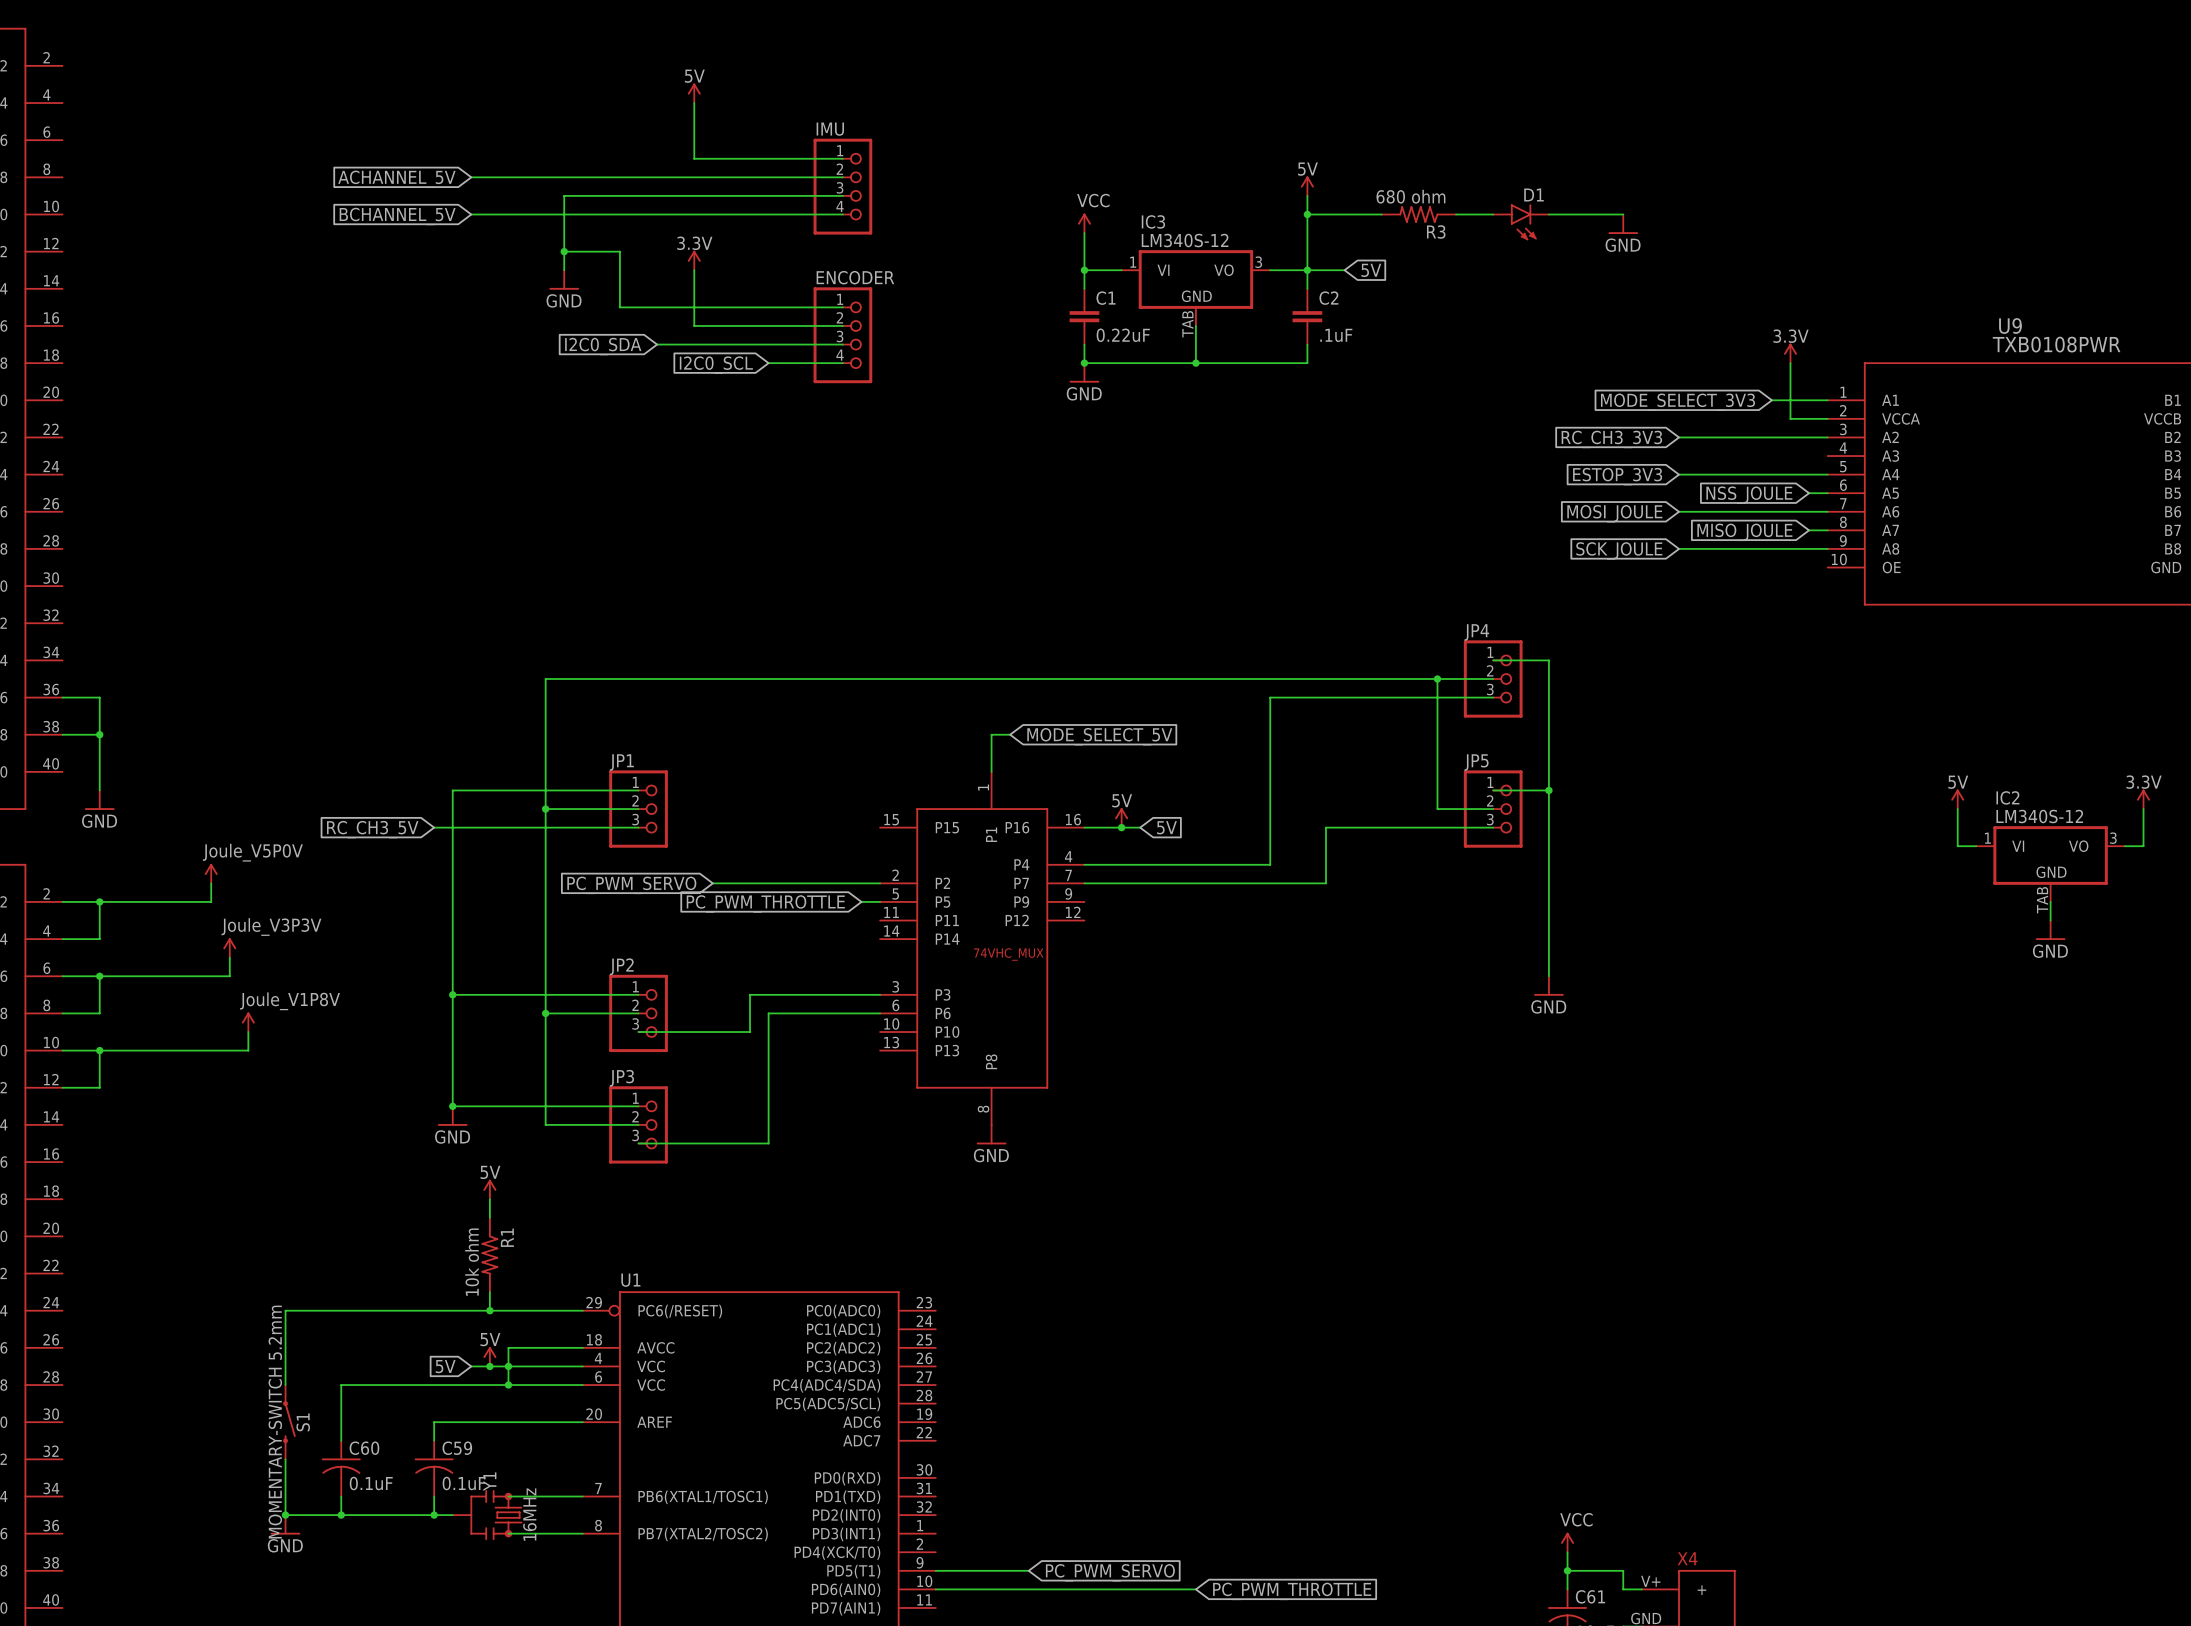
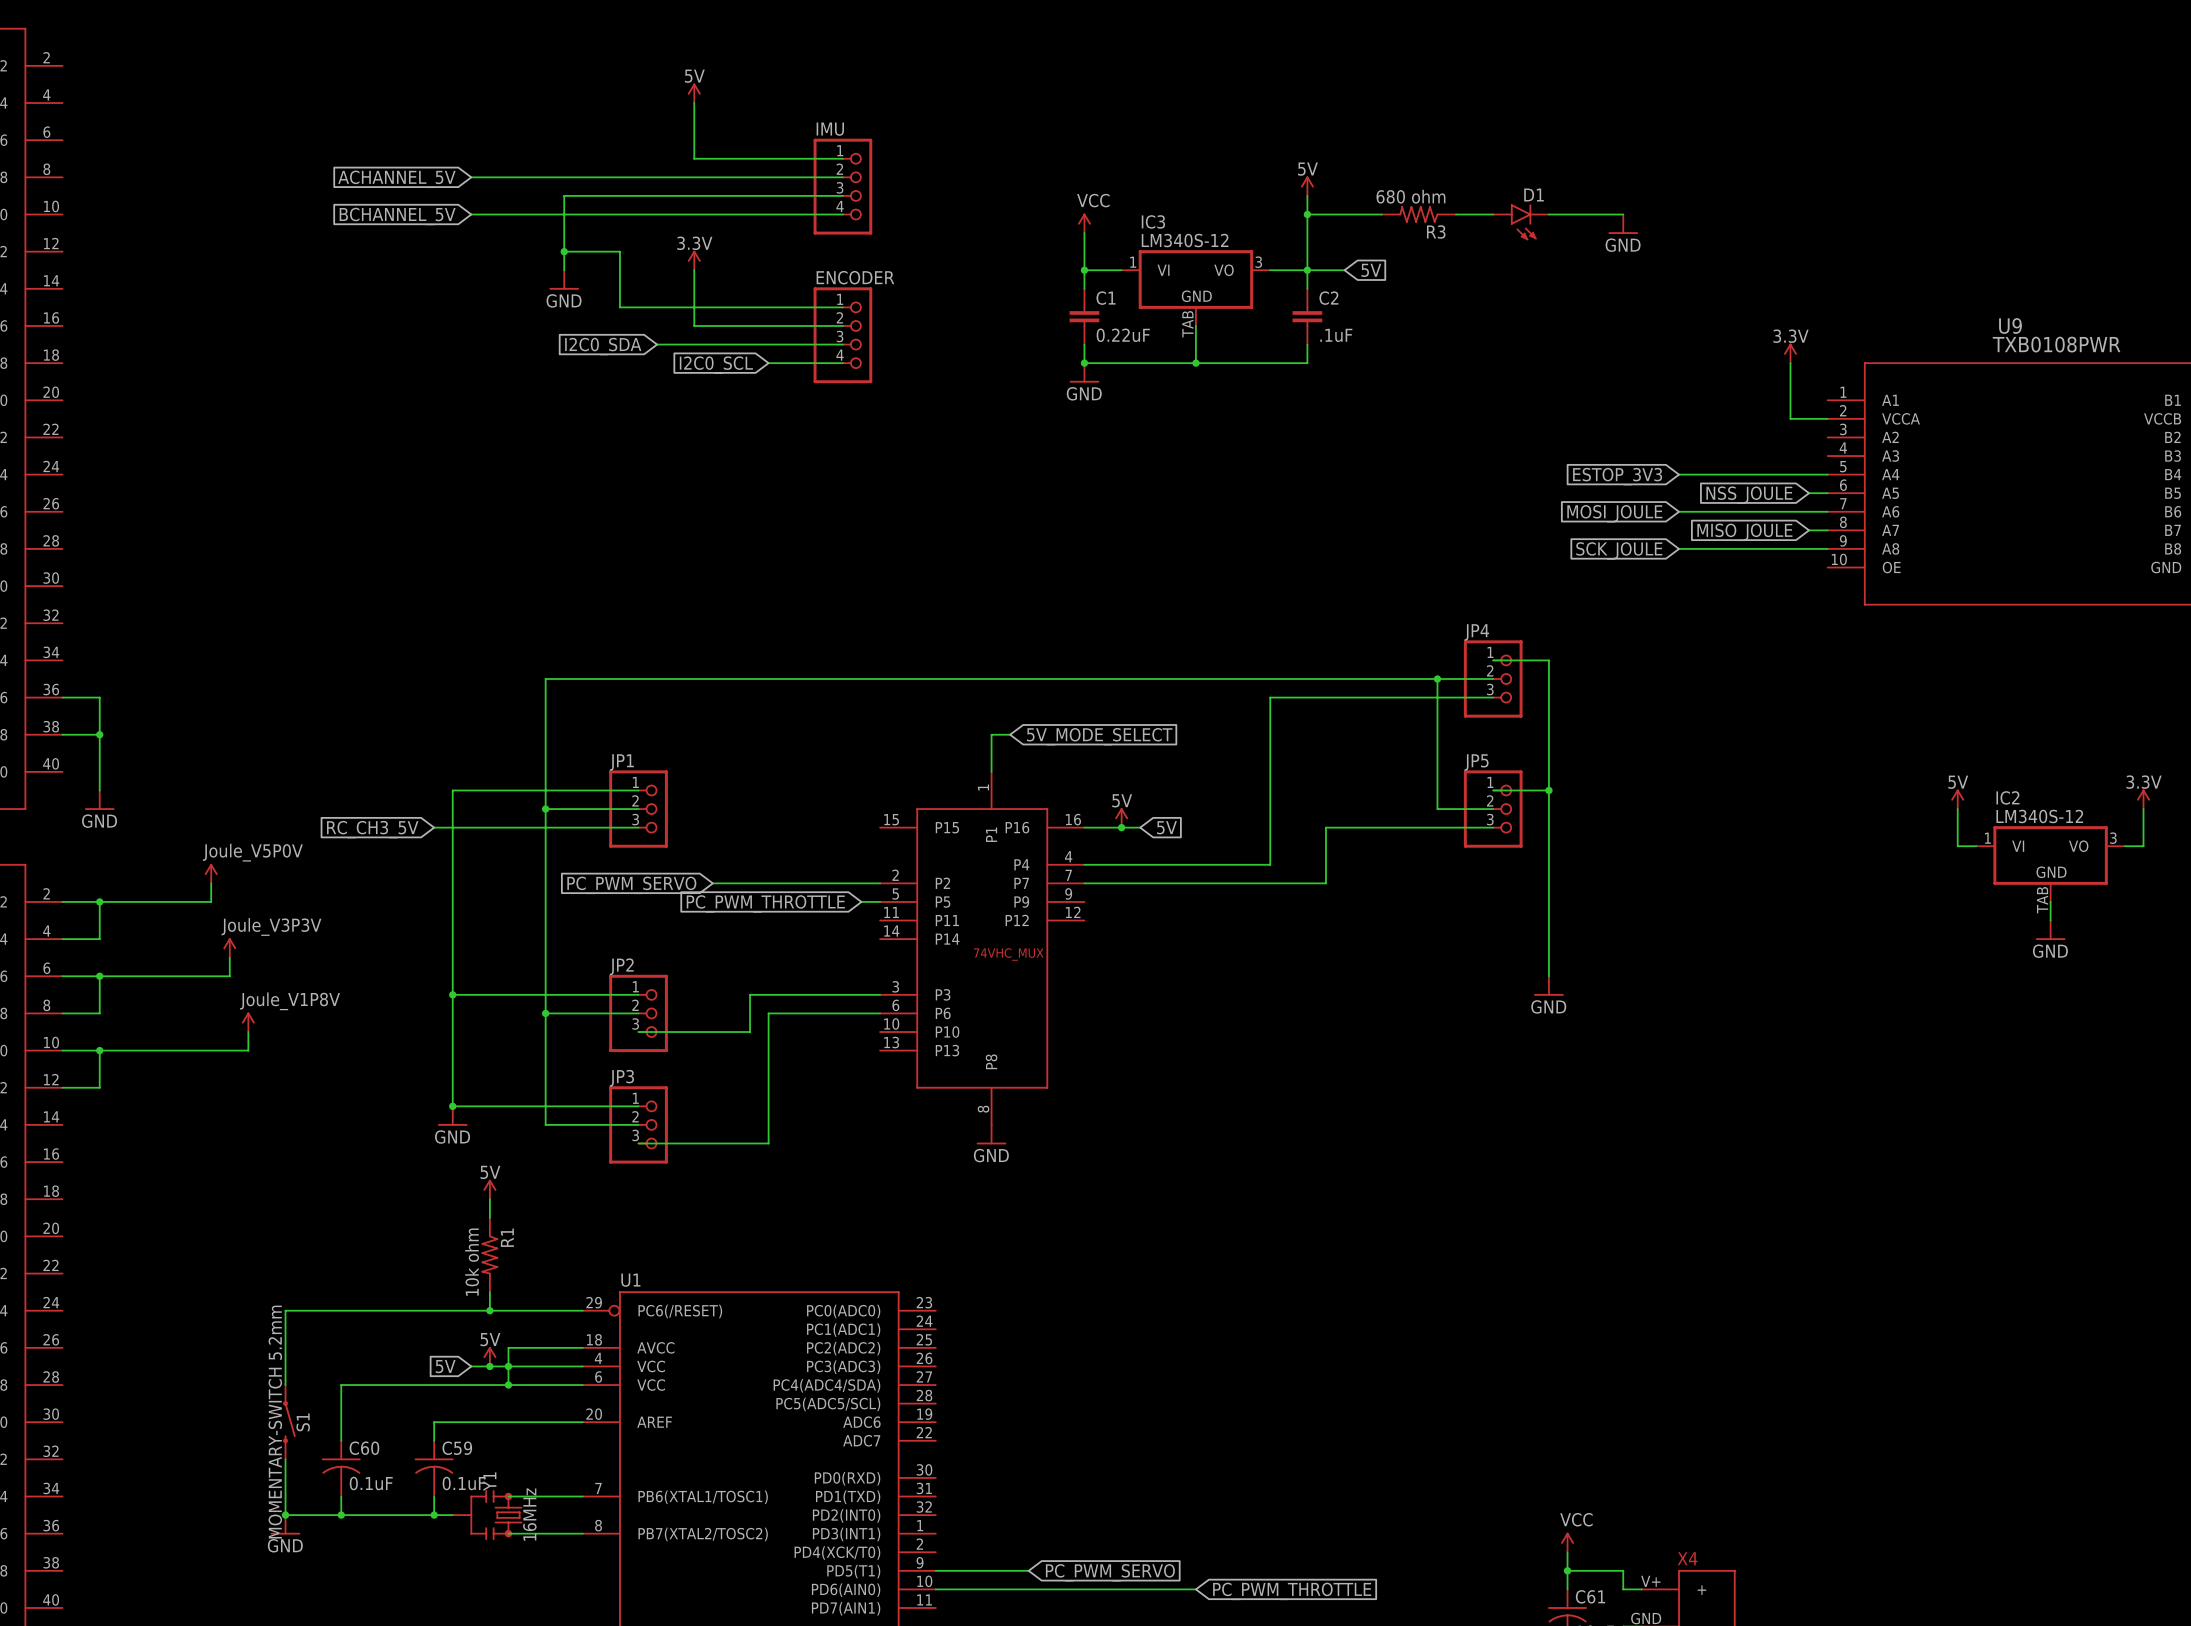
wire: (1771, 400) (1827, 400) -> none
global label: MODE_SELECT_3V3 (1677, 402) -> none
wire: (1679, 437) (1827, 437) -> none
global label: RC_CH3_3V3 (1611, 439) -> none
global label: MODE_SELECT_5V (1099, 736) -> 5V_MODE_SELECT (1099, 736)

